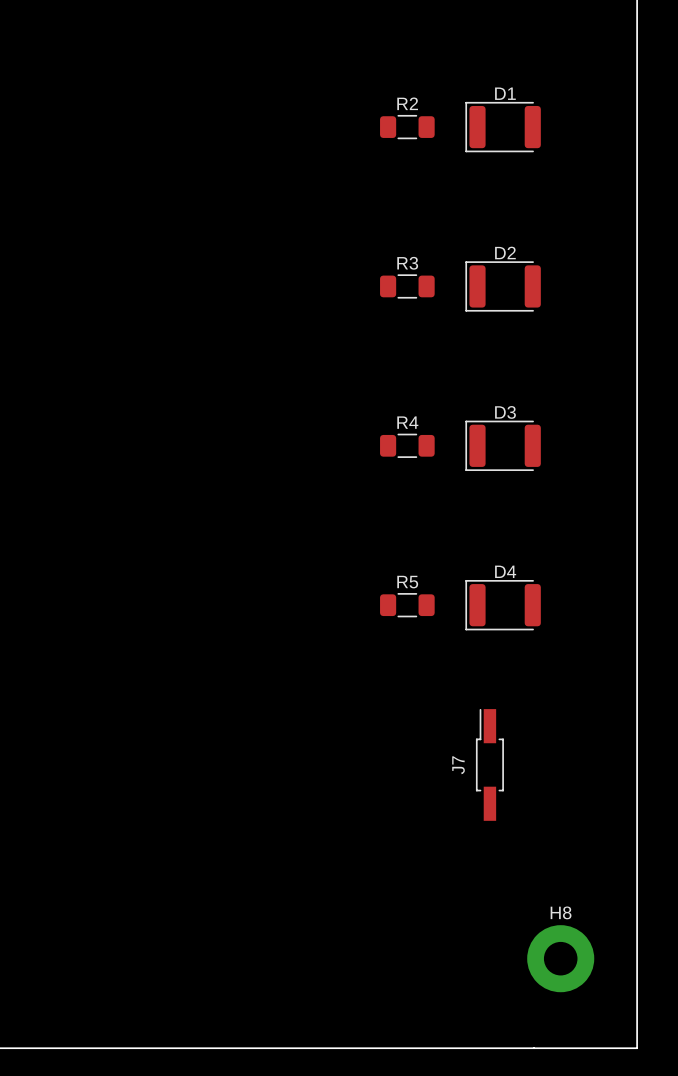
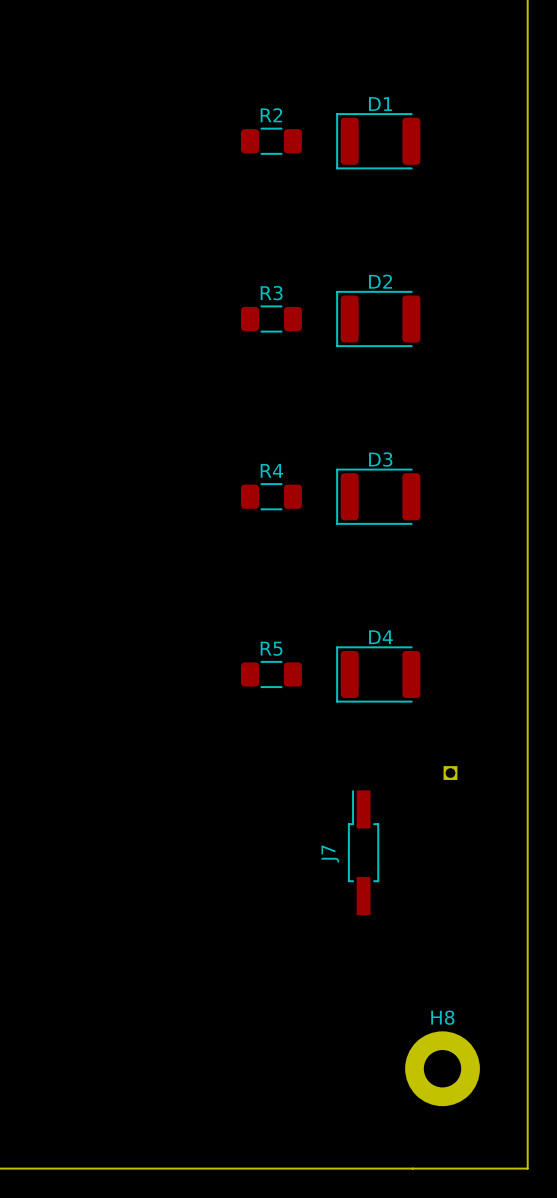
part: none -> (450, 773)

